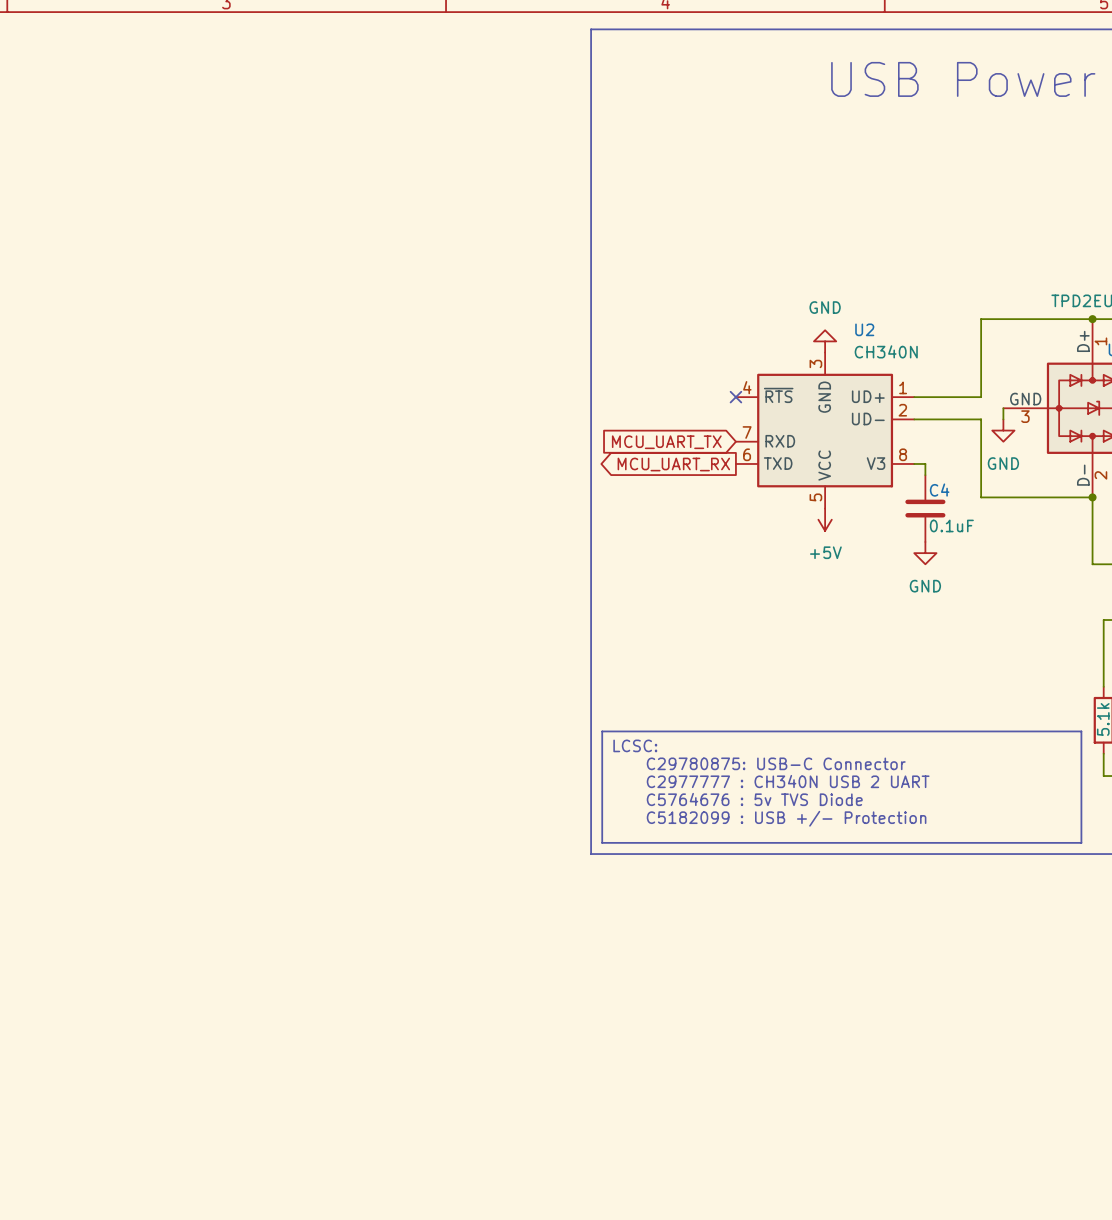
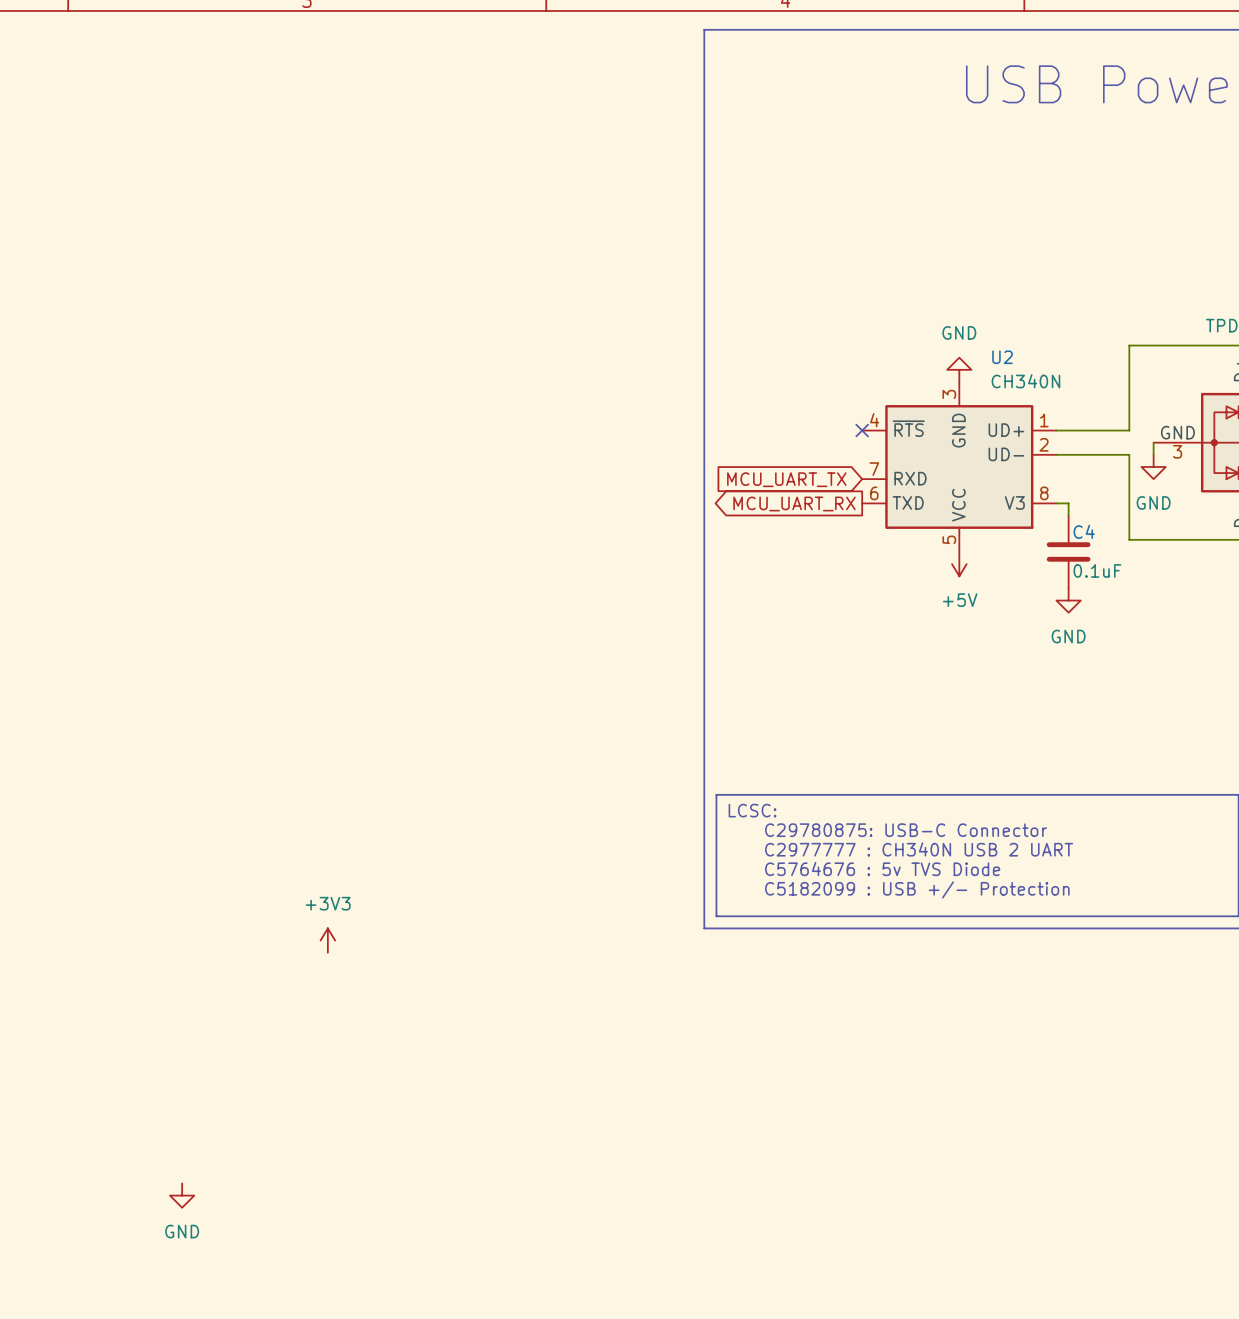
power symbol: none -> +3V3 (327, 940)
power symbol: none -> GND (182, 1195)

